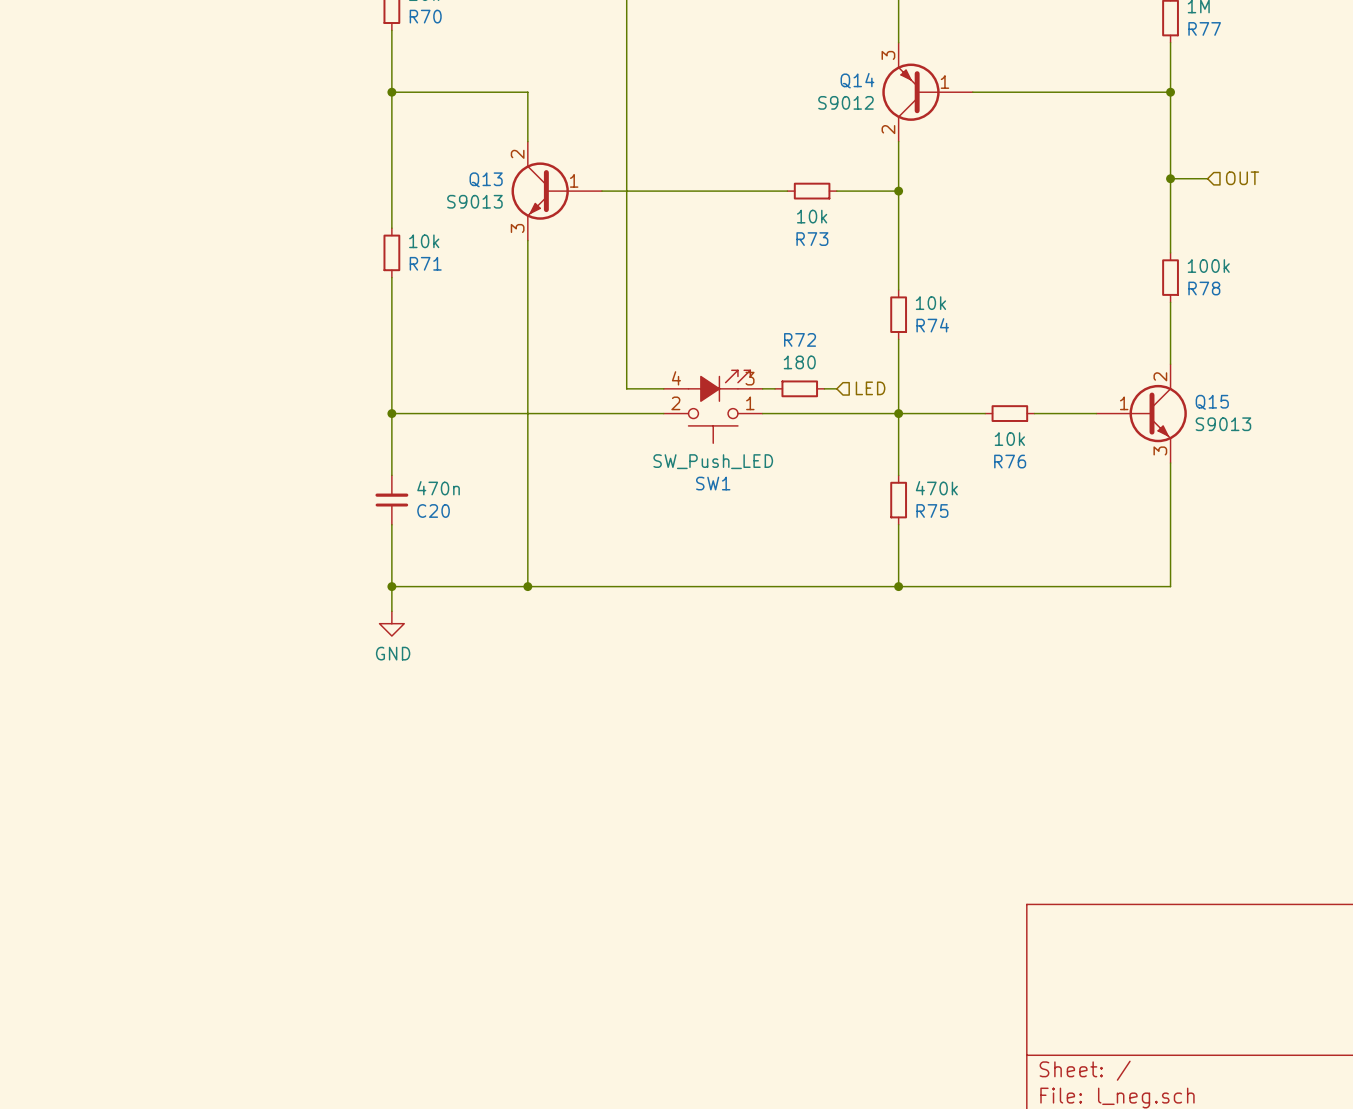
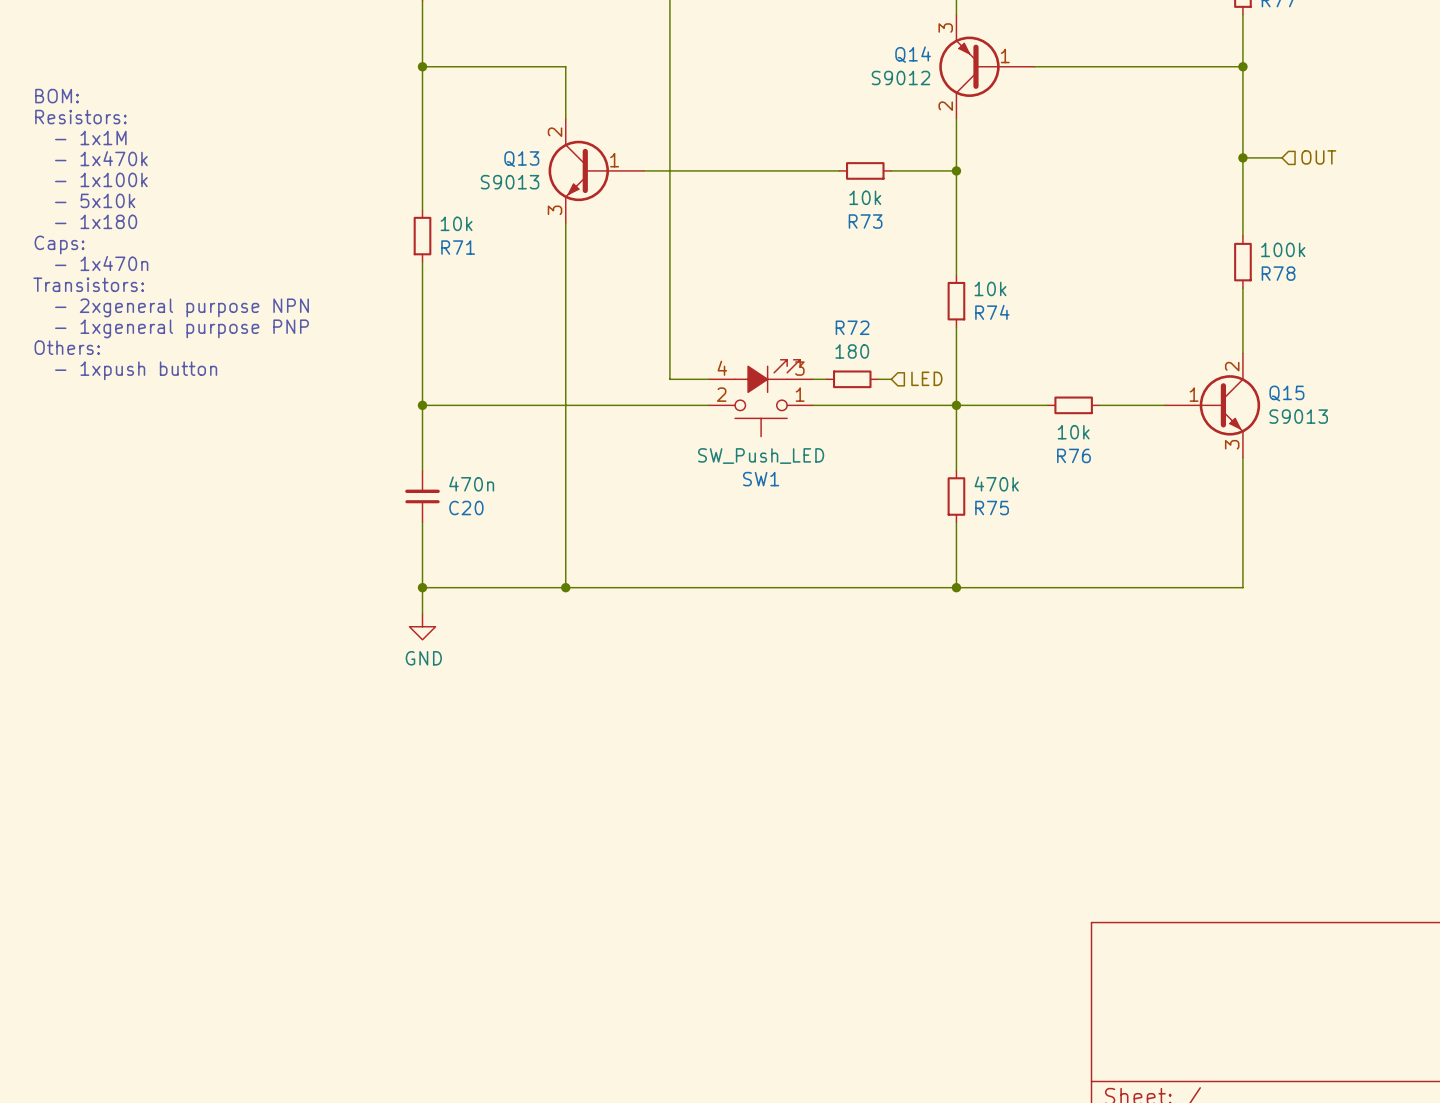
text: none -> BOM: (57, 96)
text: none -> Resistors: (80, 117)
text: none -> - 1x1M (90, 138)
text: none -> - 1x470k (101, 158)
text: none -> - 1x100k (101, 179)
text: none -> - 5x10k (95, 200)
text: none -> - 1x180 (96, 221)
text: none -> Caps: (59, 245)
text: none -> - 1x470n (101, 263)
text: none -> Transistors: (88, 284)
text: none -> - 2xgeneral purpose NPN (181, 307)
text: none -> - 1xgeneral purpose PNP (181, 328)
text: none -> Others: (67, 347)
text: none -> - 1xpush button (136, 370)

